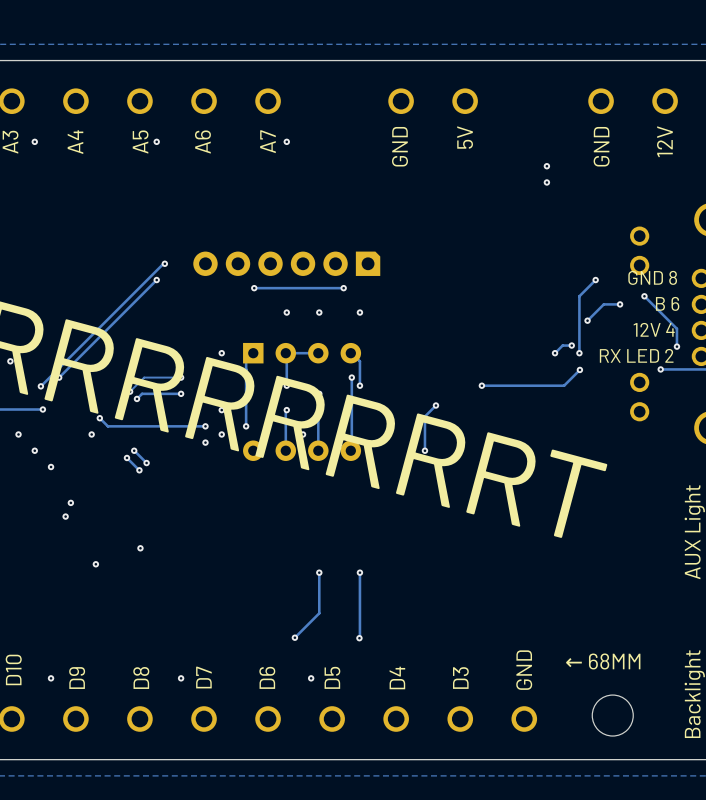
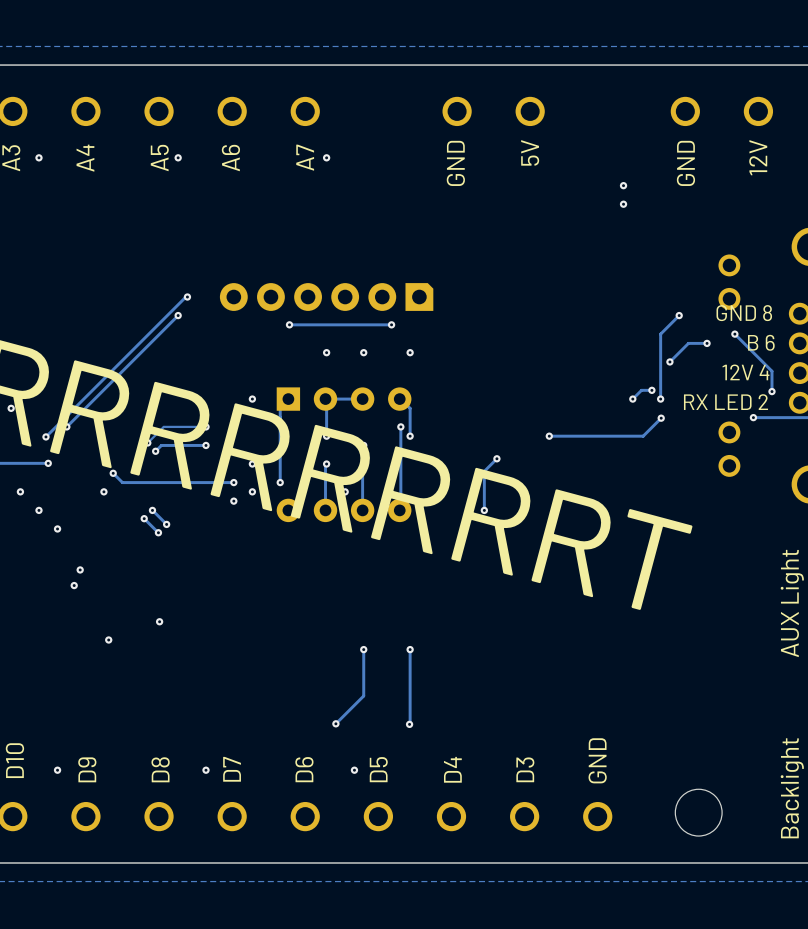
text: ← 68MM (603, 661) -> none

